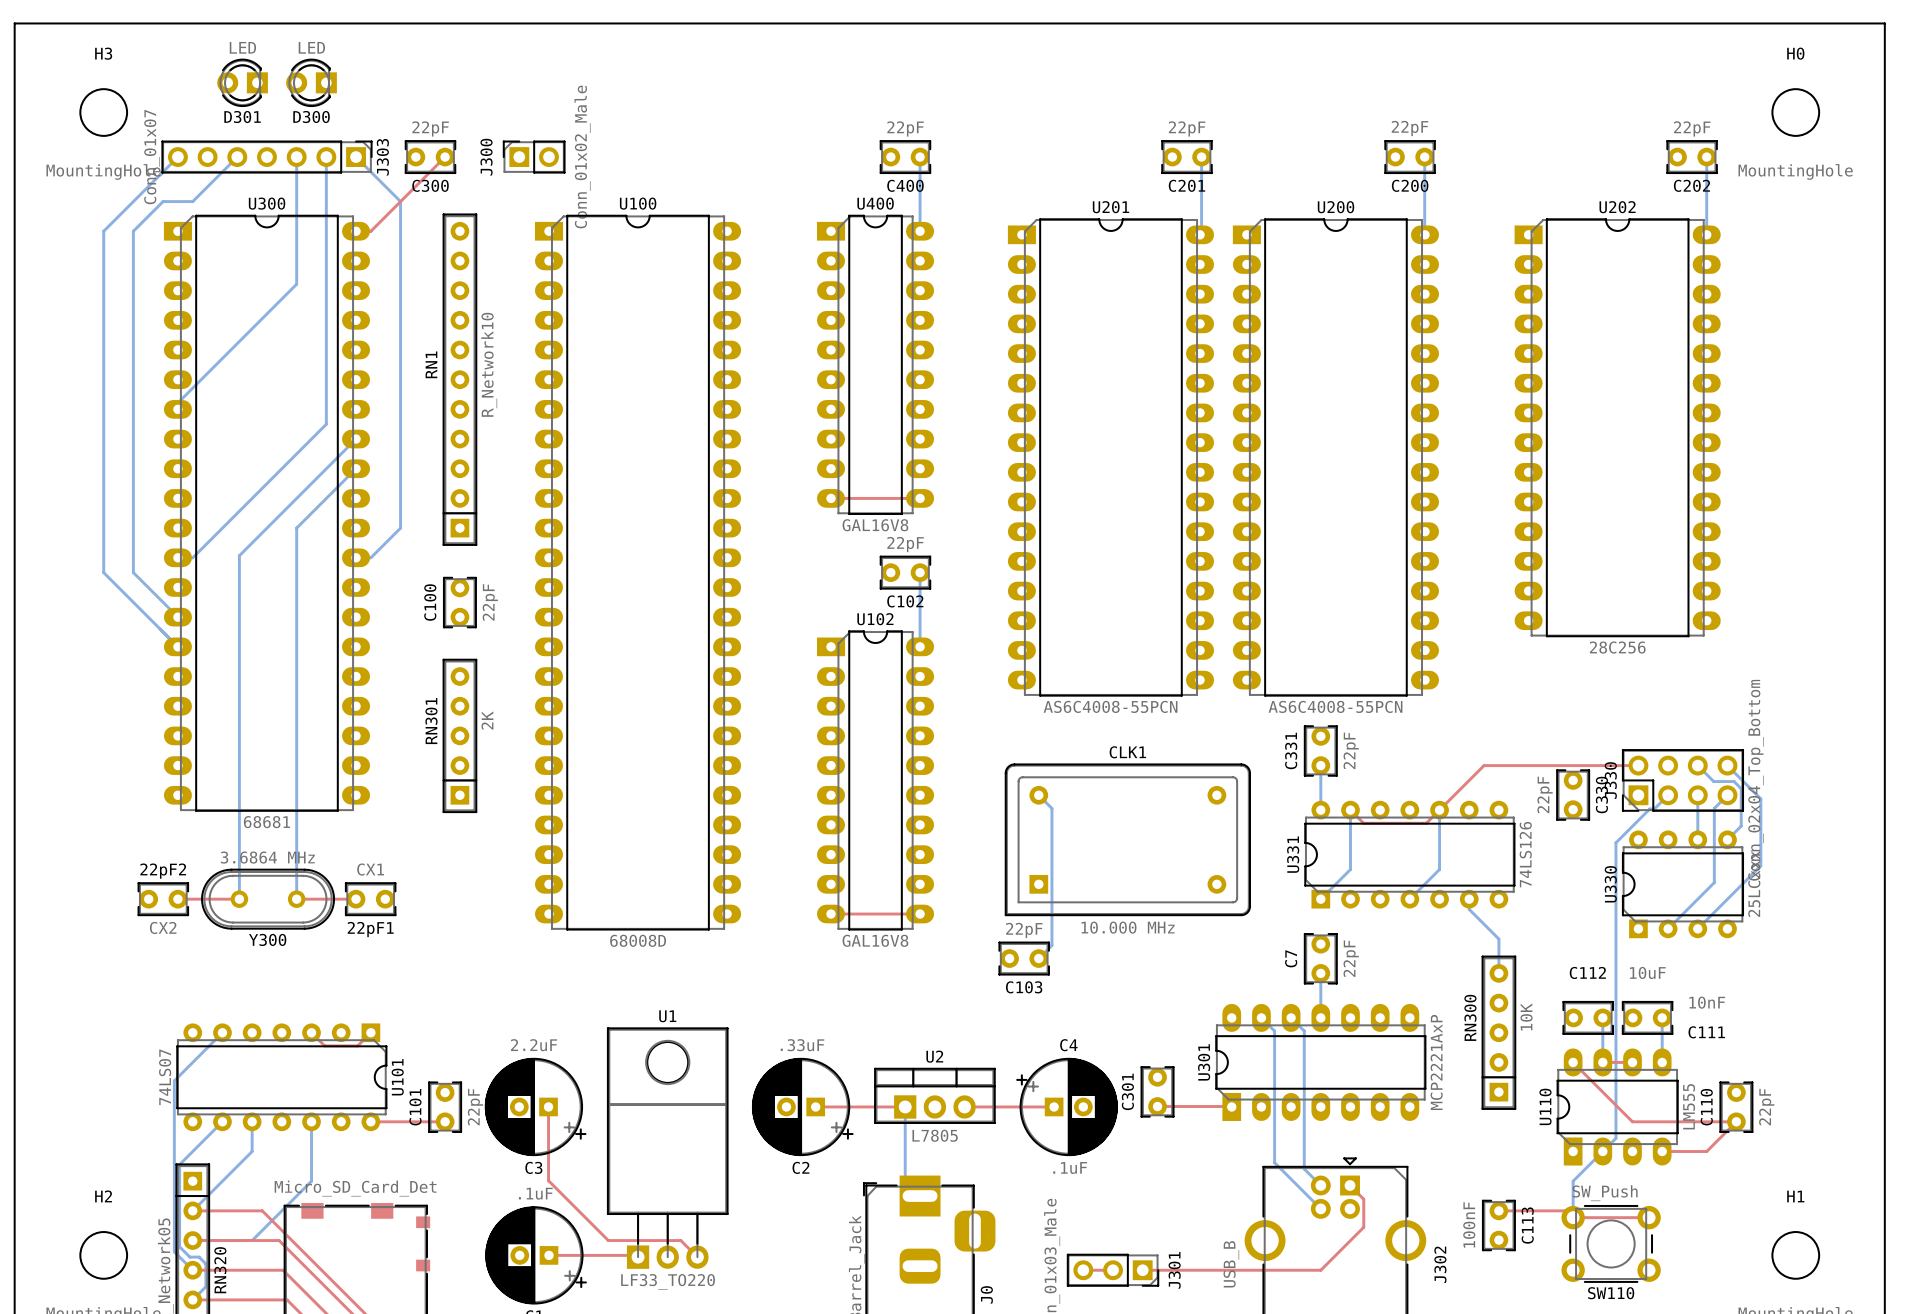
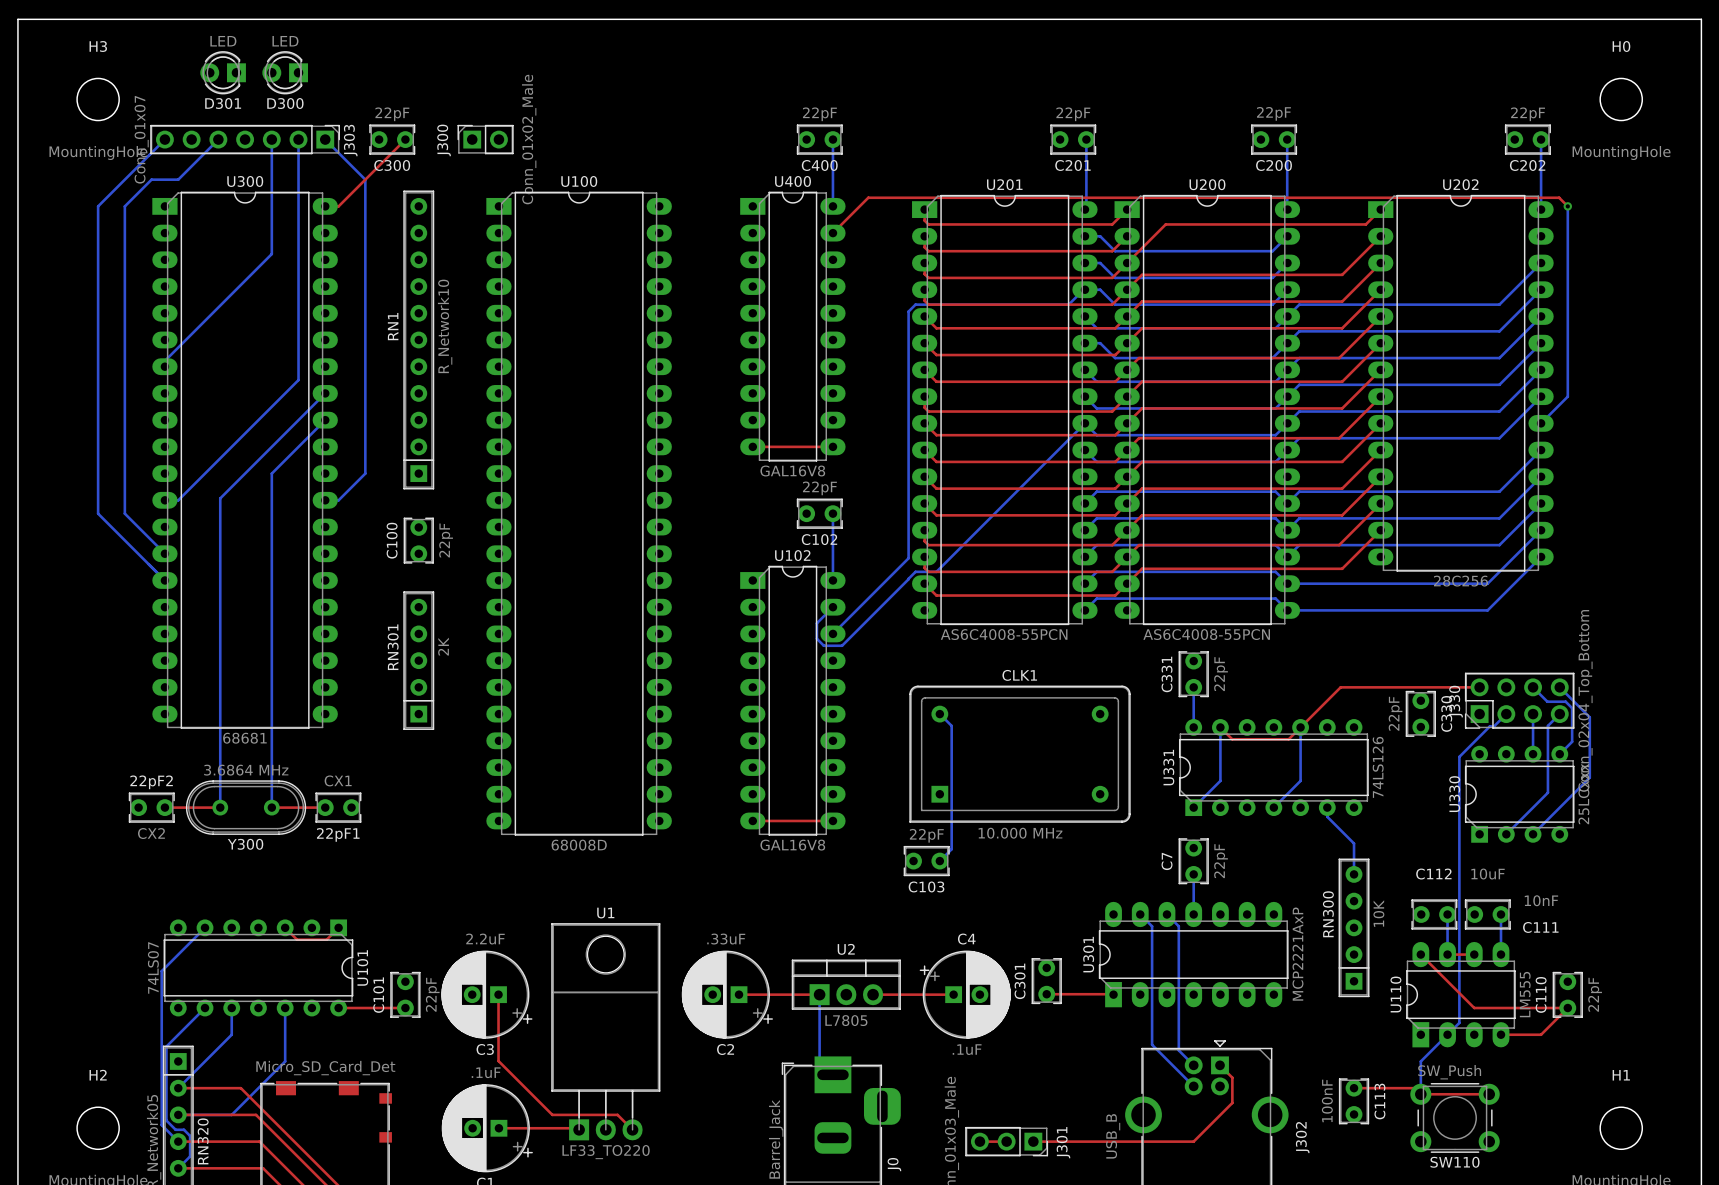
top track: none -> (1567, 206) (1559, 197) (868, 197) (832, 233)
bottom track: none -> (1567, 206) (1567, 396) (1541, 423)
via: none -> (1567, 206)
top track: none -> (924, 209) (924, 220) (928, 224) (1112, 224) (1127, 209)
top track: none -> (1380, 209) (1365, 224) (1165, 224) (1112, 277) (928, 277) (924, 274) (924, 263)
top track: none -> (924, 236) (924, 247) (928, 251) (1112, 251) (1127, 236)
bottom track: none -> (1084, 236) (1100, 236) (1115, 251) (1272, 251) (1287, 236)
top track: none -> (1380, 236) (1342, 274) (1142, 274) (1112, 304) (928, 304) (924, 300) (924, 289)
bottom track: none -> (1084, 263) (1100, 263) (1115, 277) (1272, 277) (1287, 263)
top track: none -> (1380, 263) (1342, 301) (1142, 301) (1115, 328) (936, 328) (924, 316)
bottom track: none -> (1541, 263) (1499, 304) (1299, 304) (1275, 328) (1096, 328) (1084, 316)
bottom track: none -> (1287, 289) (1272, 304) (1115, 304) (1100, 289) (1083, 289) (1068, 304) (915, 304) (908, 311) (908, 558) (832, 633)
top track: none -> (1380, 289) (1342, 328) (1142, 328) (1115, 355) (936, 355) (924, 343)
bottom track: none -> (1541, 289) (1499, 331) (1299, 331) (1272, 358) (1115, 358) (1100, 343) (1084, 343)
top track: none -> (1380, 316) (1339, 358) (1138, 358) (1115, 381) (936, 381) (924, 369)
bottom track: none -> (1541, 316) (1499, 358) (1299, 358) (1275, 381) (1096, 381) (1084, 369)
top track: none -> (1380, 343) (1342, 381) (1142, 381) (1112, 411) (928, 411) (924, 407) (924, 396)
bottom track: none -> (1541, 343) (1499, 384) (1299, 384) (1275, 408) (1096, 408) (1084, 396)
top track: none -> (1380, 369) (1342, 408) (1142, 408) (1115, 435) (936, 435) (924, 423)
bottom track: none -> (1541, 369) (1499, 411) (1299, 411) (1275, 435) (1096, 435) (1084, 423) (936, 571) (915, 571) (842, 645) (823, 645) (816, 638) (816, 623) (832, 607)
top track: none -> (1380, 396) (1339, 438) (1138, 438) (1115, 461) (936, 461) (924, 450)
bottom track: none -> (1541, 396) (1499, 438) (1299, 438) (1275, 461) (1096, 461) (1084, 450)
top track: none -> (1380, 423) (1342, 461) (1142, 461) (1115, 488) (936, 488) (924, 476)
top track: none -> (1380, 450) (1342, 488) (1142, 488) (1115, 515) (936, 515) (924, 503)
bottom track: none -> (1541, 450) (1499, 491) (1299, 491) (1287, 503) (1275, 491) (1096, 491) (1084, 503)
top track: none -> (1380, 476) (1342, 515) (1142, 515) (1112, 545) (928, 545) (924, 541) (924, 530)
bottom track: none -> (1541, 476) (1499, 518) (1299, 518) (1287, 530) (1275, 518) (1096, 518) (1084, 530)
top track: none -> (1380, 503) (1339, 545) (1138, 545) (1112, 571) (928, 571) (924, 568) (924, 556)
bottom track: none -> (1541, 503) (1499, 545) (1299, 545) (1287, 556) (1275, 545) (1096, 545) (1084, 556)
top track: none -> (1380, 530) (1342, 568) (1142, 568) (1115, 595) (936, 595) (924, 583)
bottom track: none -> (1541, 530) (1487, 583) (1287, 583) (1275, 571) (1096, 571) (1084, 583)
bottom track: none -> (1541, 556) (1487, 610) (1287, 610) (1275, 598) (1096, 598) (1084, 610)

